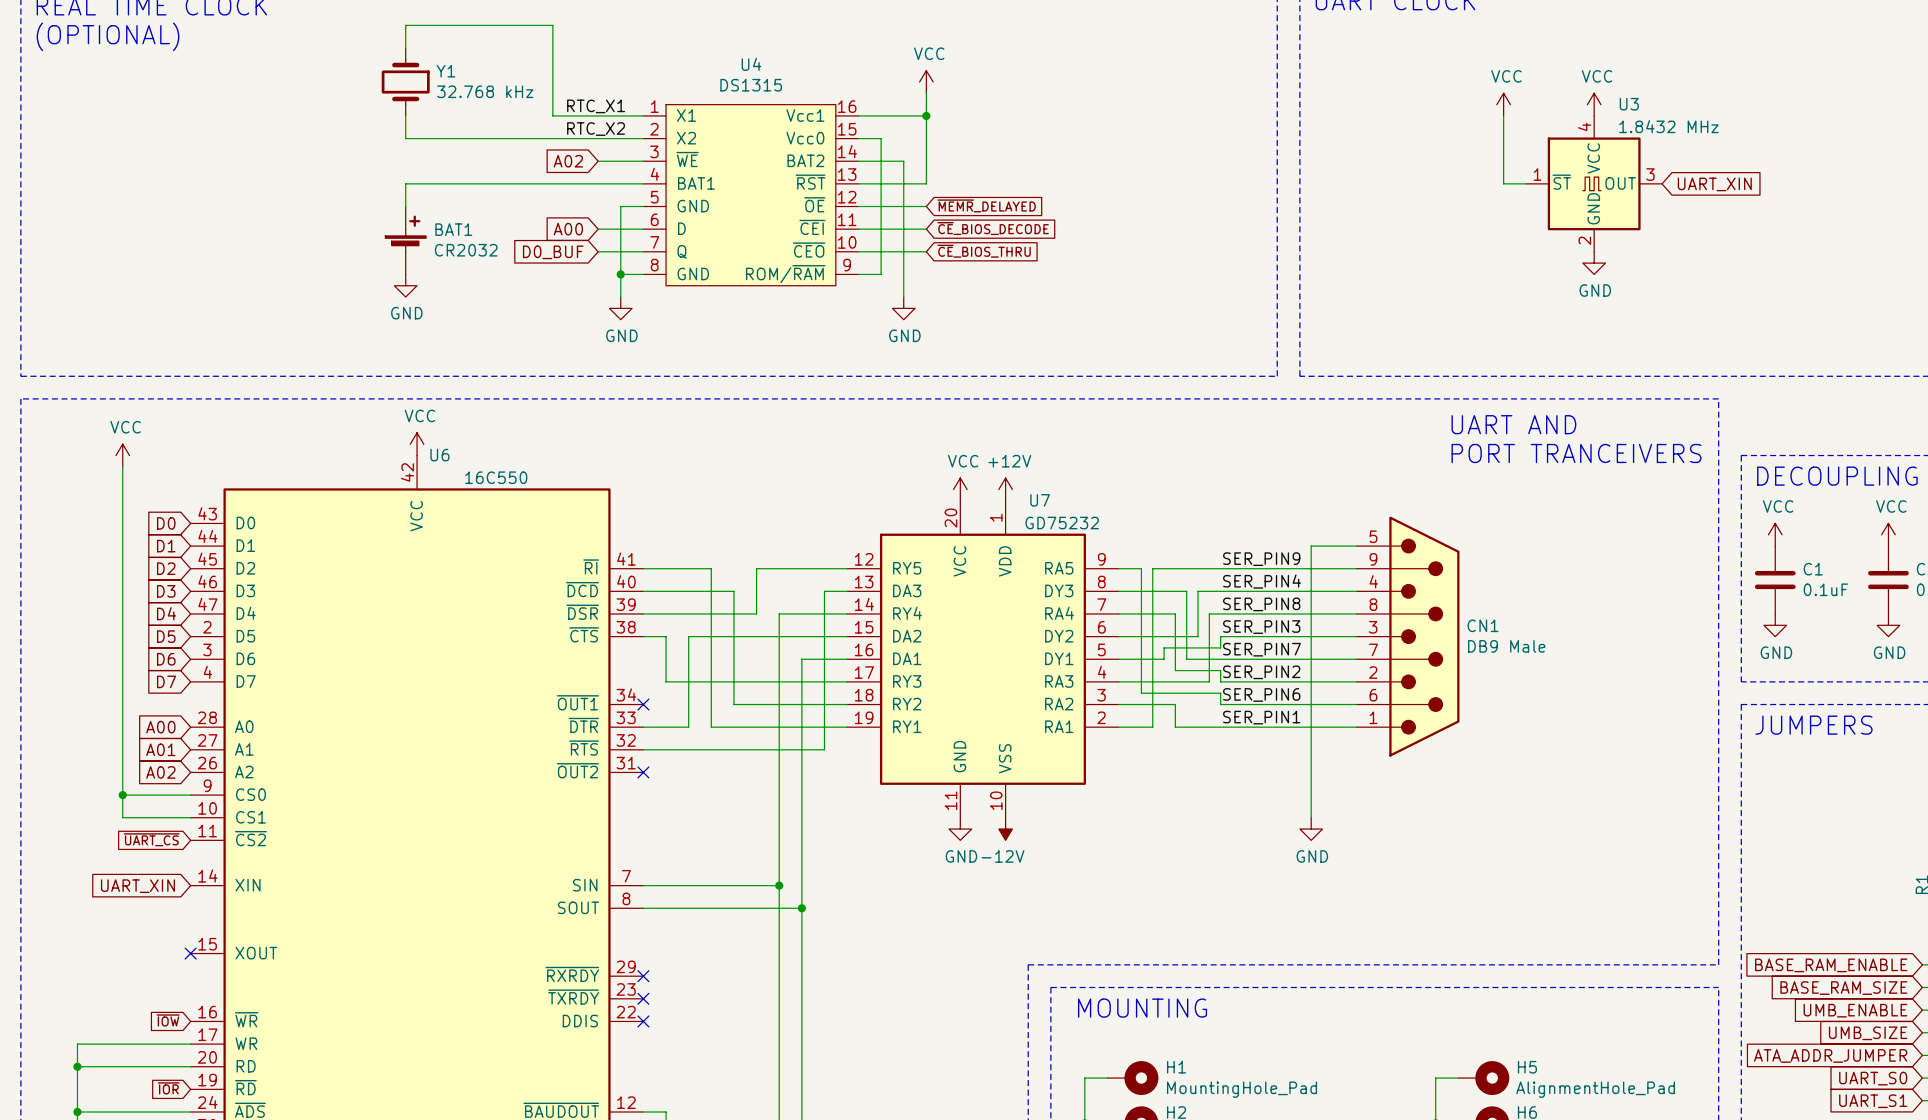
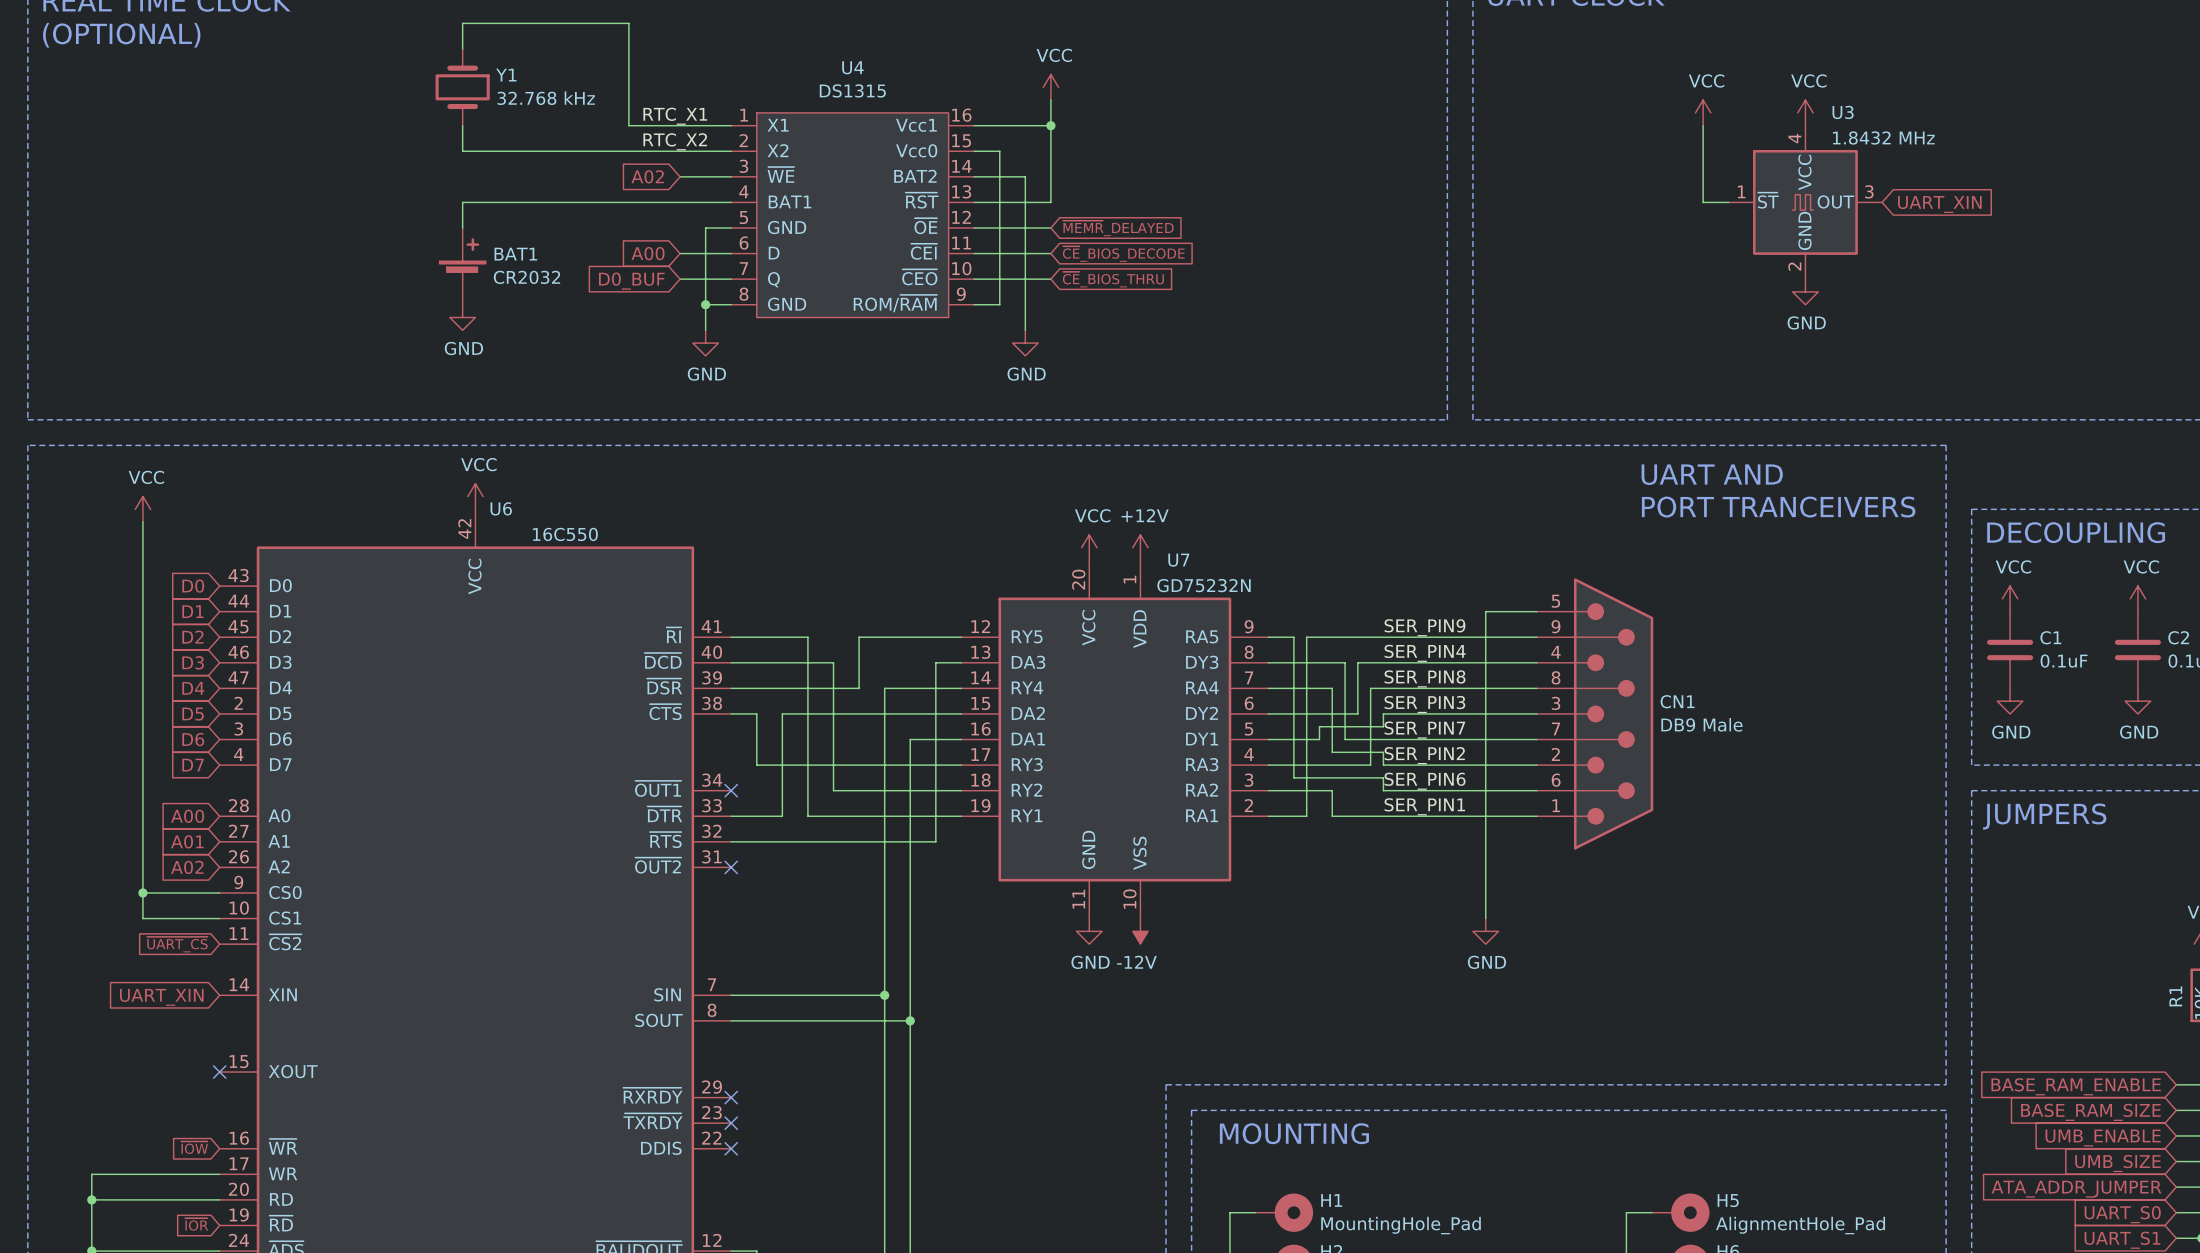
U7 value: GD75232 (1062, 523) -> GD75232N (1204, 585)

